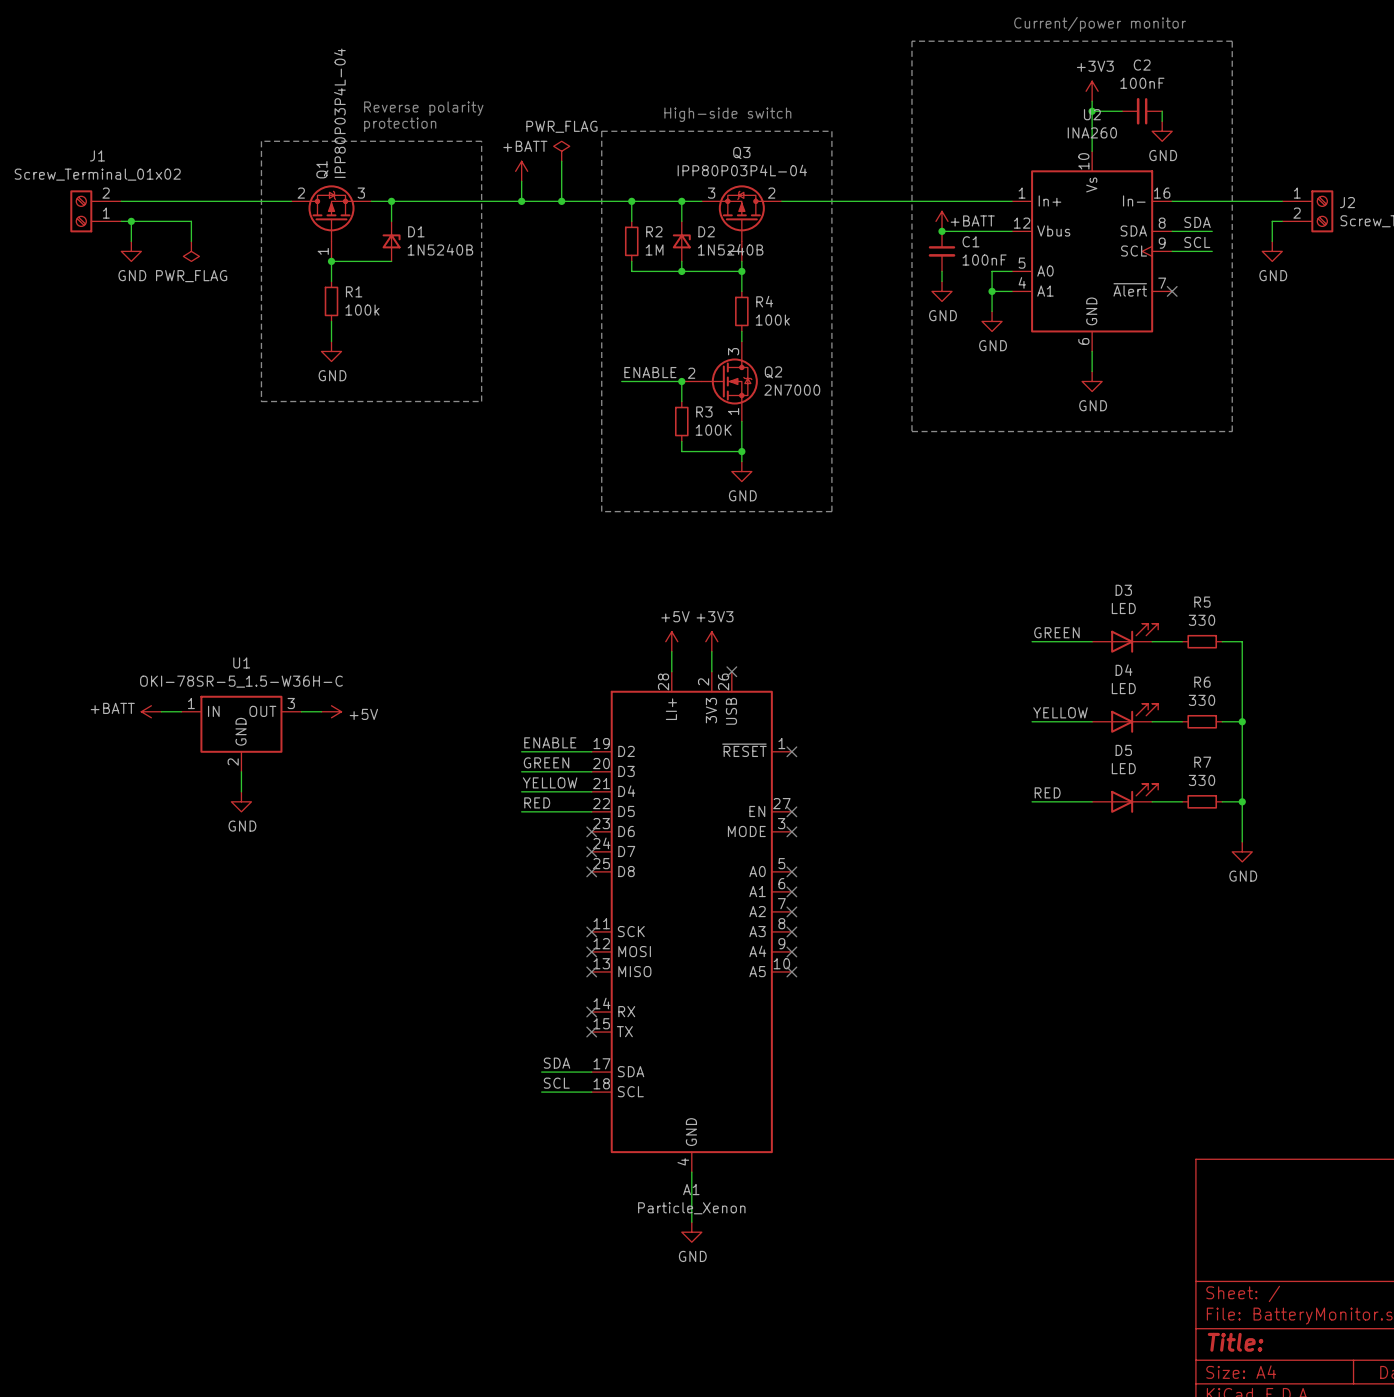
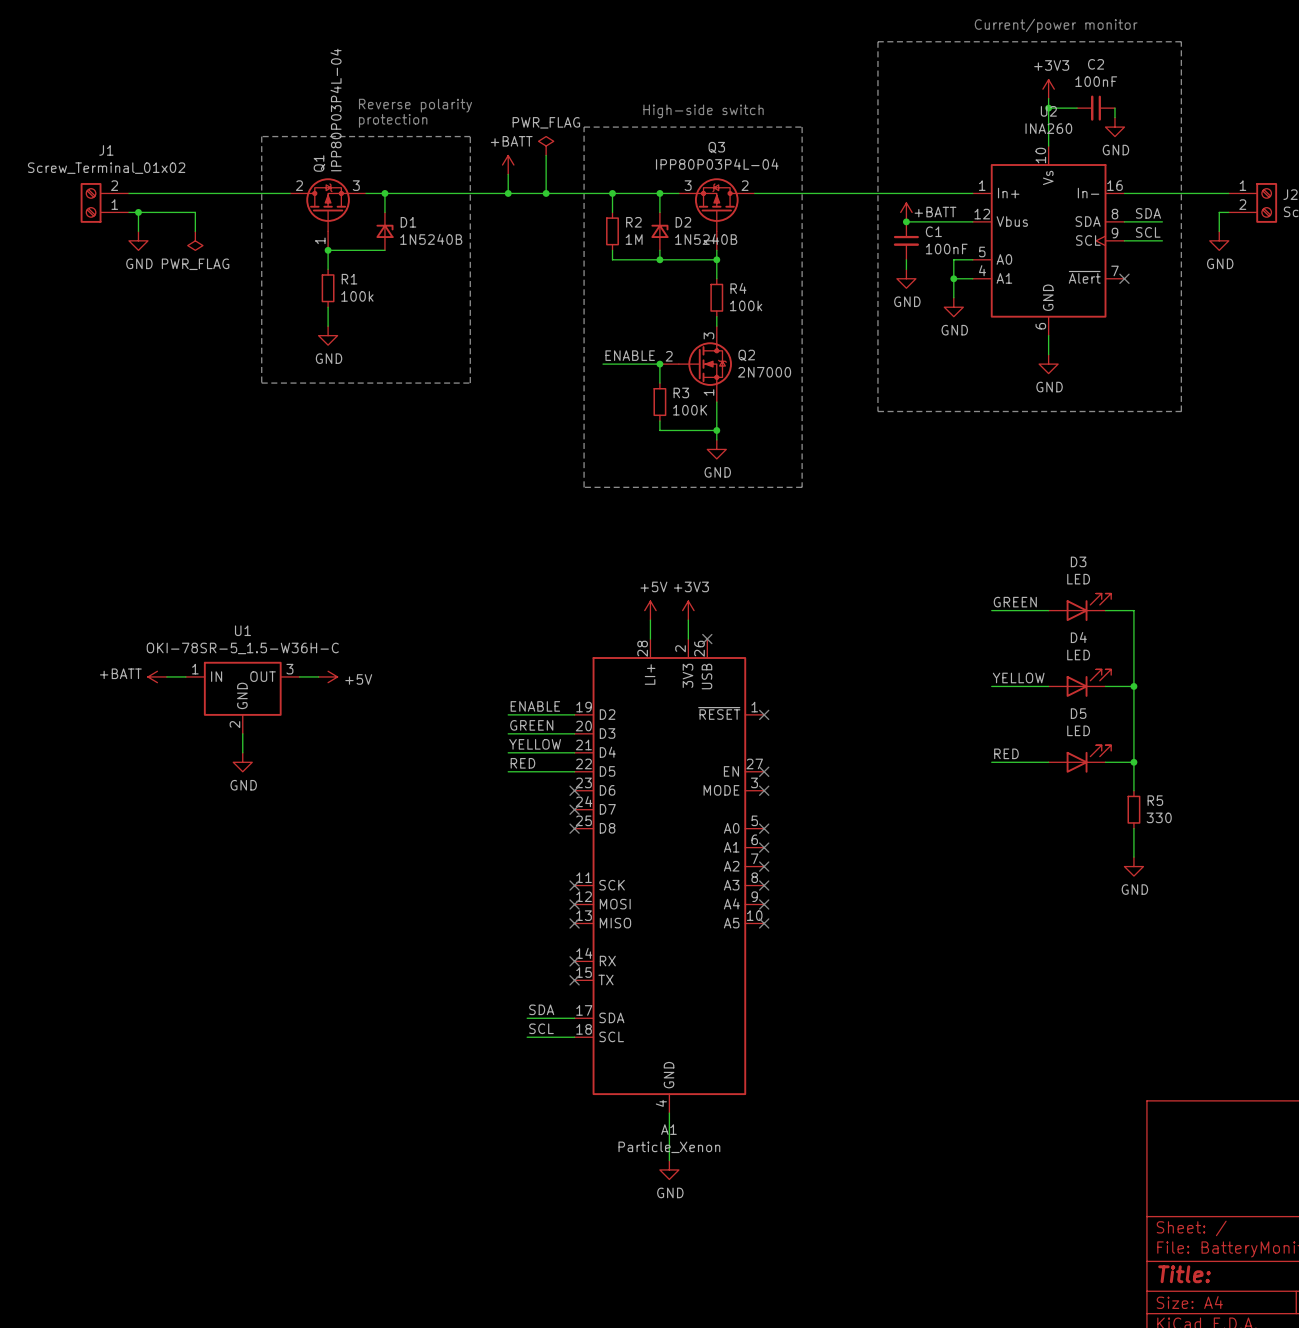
R5 name position: R5 (1202, 602) -> R5 (1155, 800)
wire: none -> (1133, 610) (1133, 790)
R5 rotation: 0° (1202, 641) -> 90° clockwise (1133, 809)
R5 position: (1202, 641) -> (1133, 809)
wire: (1222, 641) (1242, 641) (1242, 841) -> none
junction: none -> (1133, 686)
R6: 330 (1202, 721) -> none
wire: (1222, 721) (1242, 721) -> none
junction: (1242, 721) -> none
junction: none -> (1133, 762)
R7: 330 (1202, 801) -> none
wire: (1222, 801) (1242, 801) -> none
junction: (1242, 801) -> none
power symbol position: GND (1242, 851) -> GND (1133, 866)
wire: none -> (1133, 828) (1133, 857)

